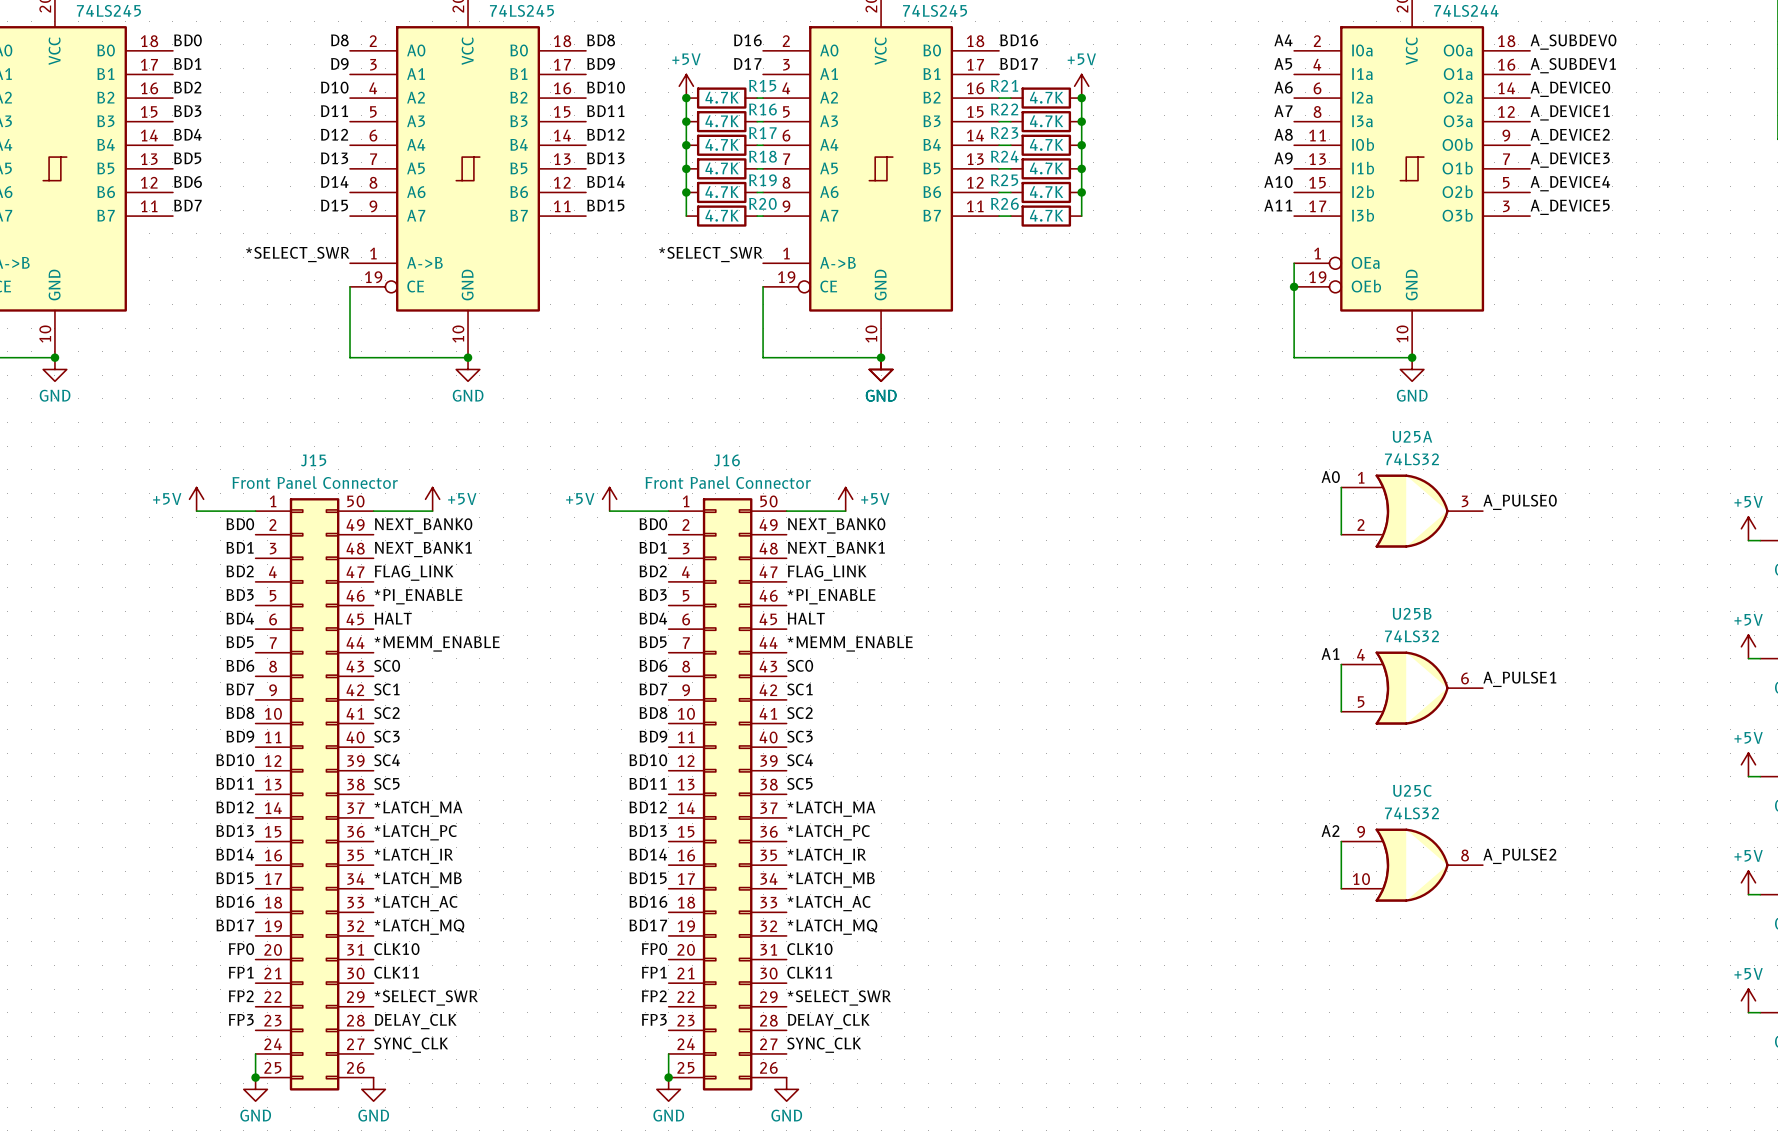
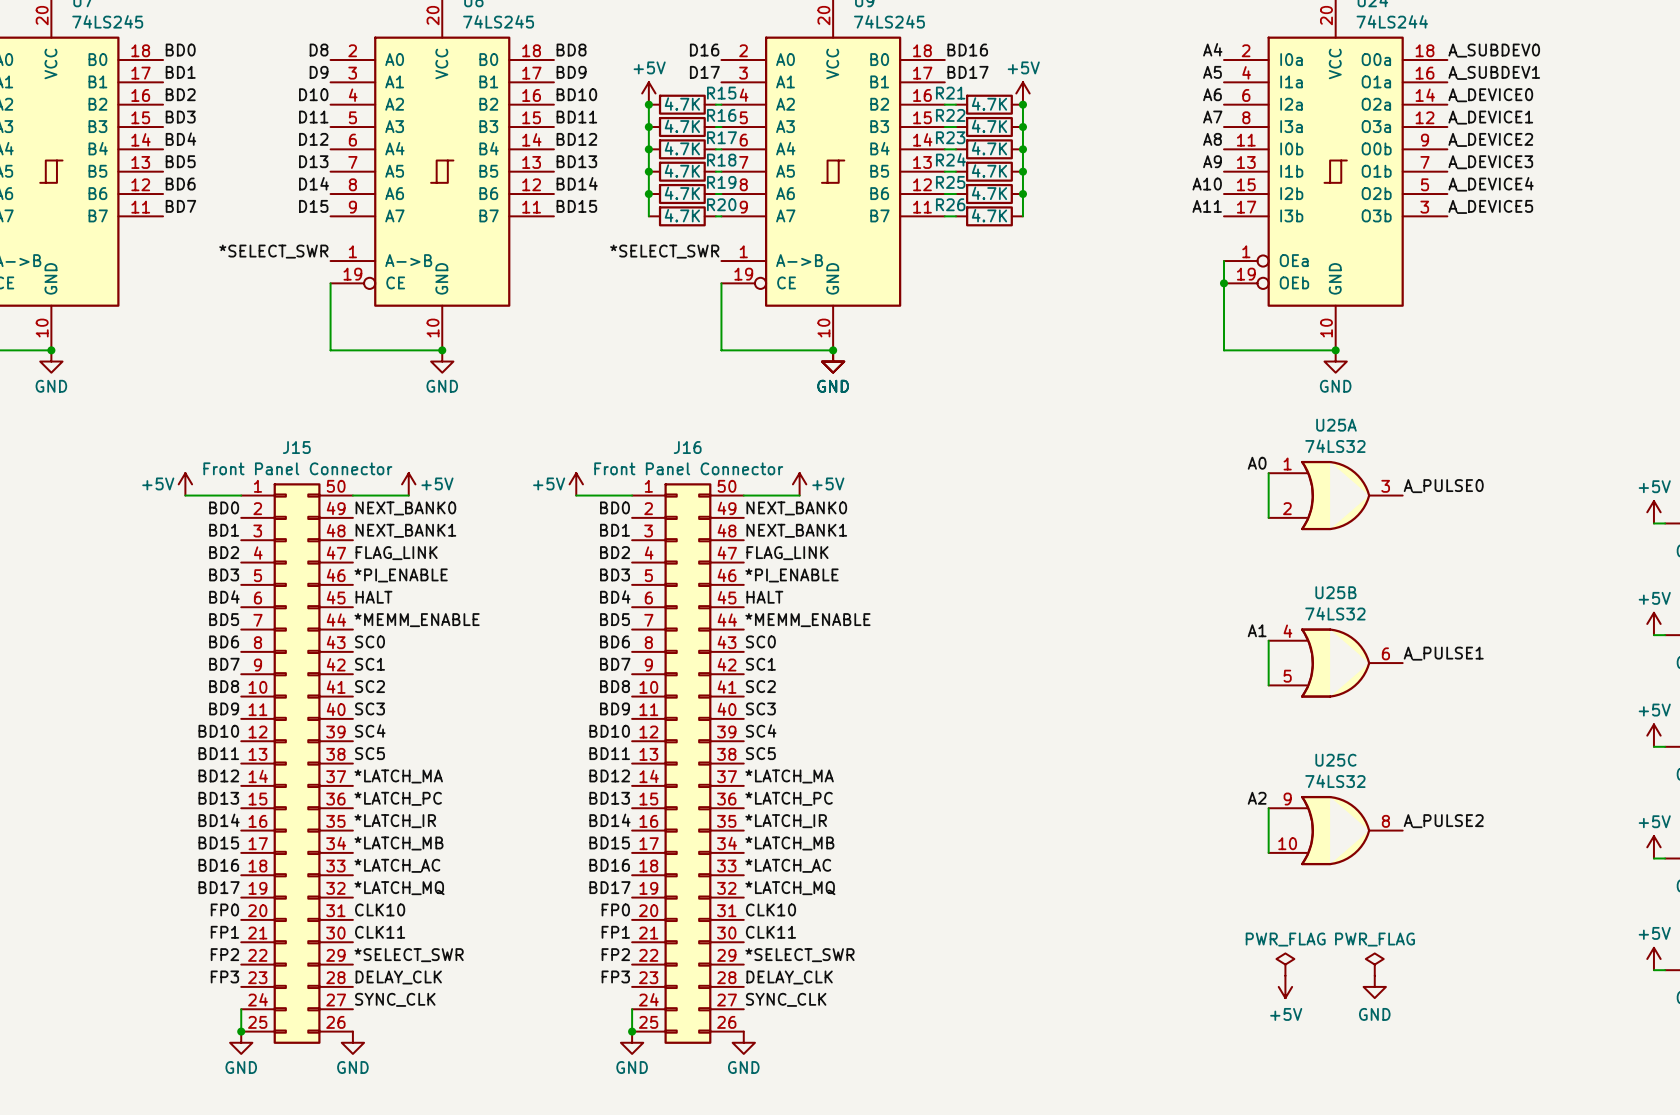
power symbol: none -> PWR_FLAG (1285, 964)
power symbol: none -> PWR_FLAG (1374, 964)
power symbol: none -> +5V (1285, 986)
power symbol: none -> GND (1374, 986)

